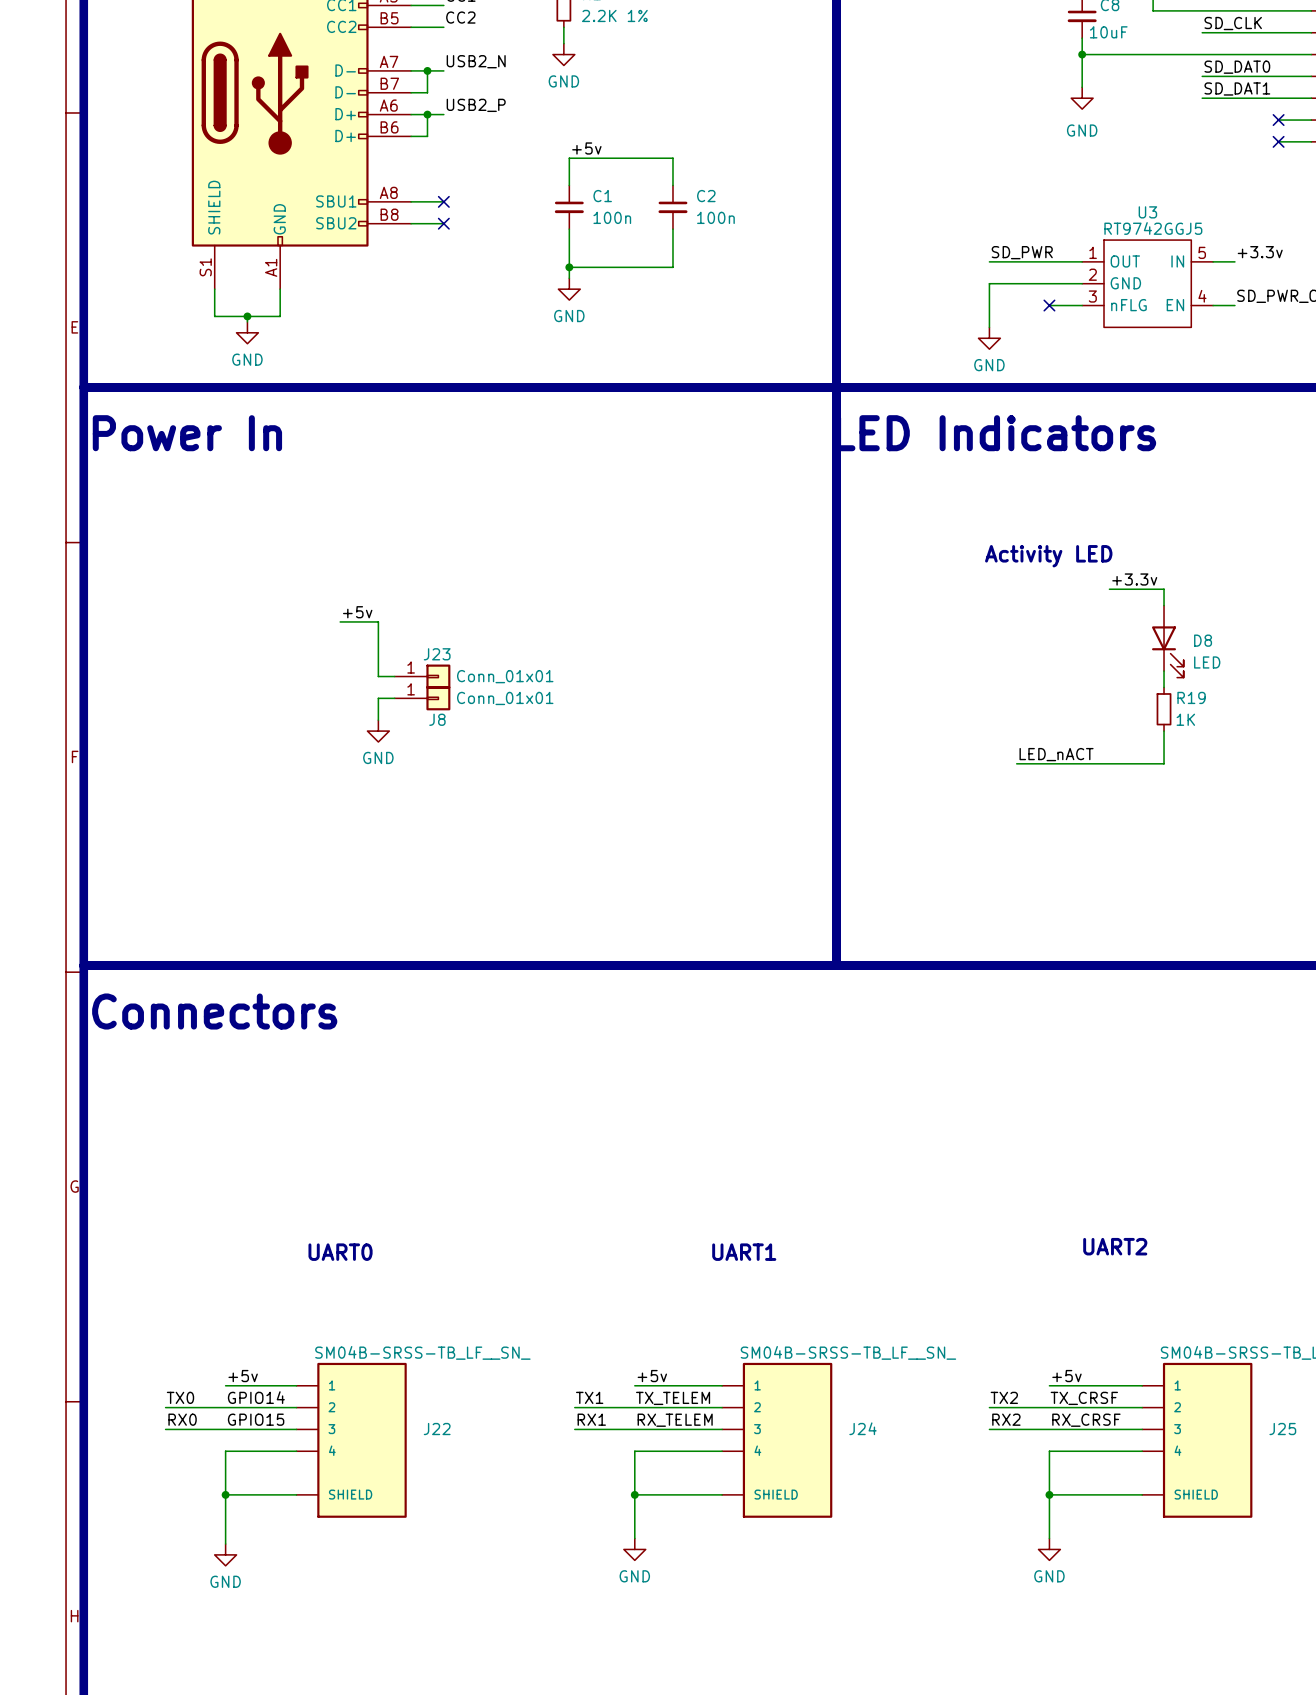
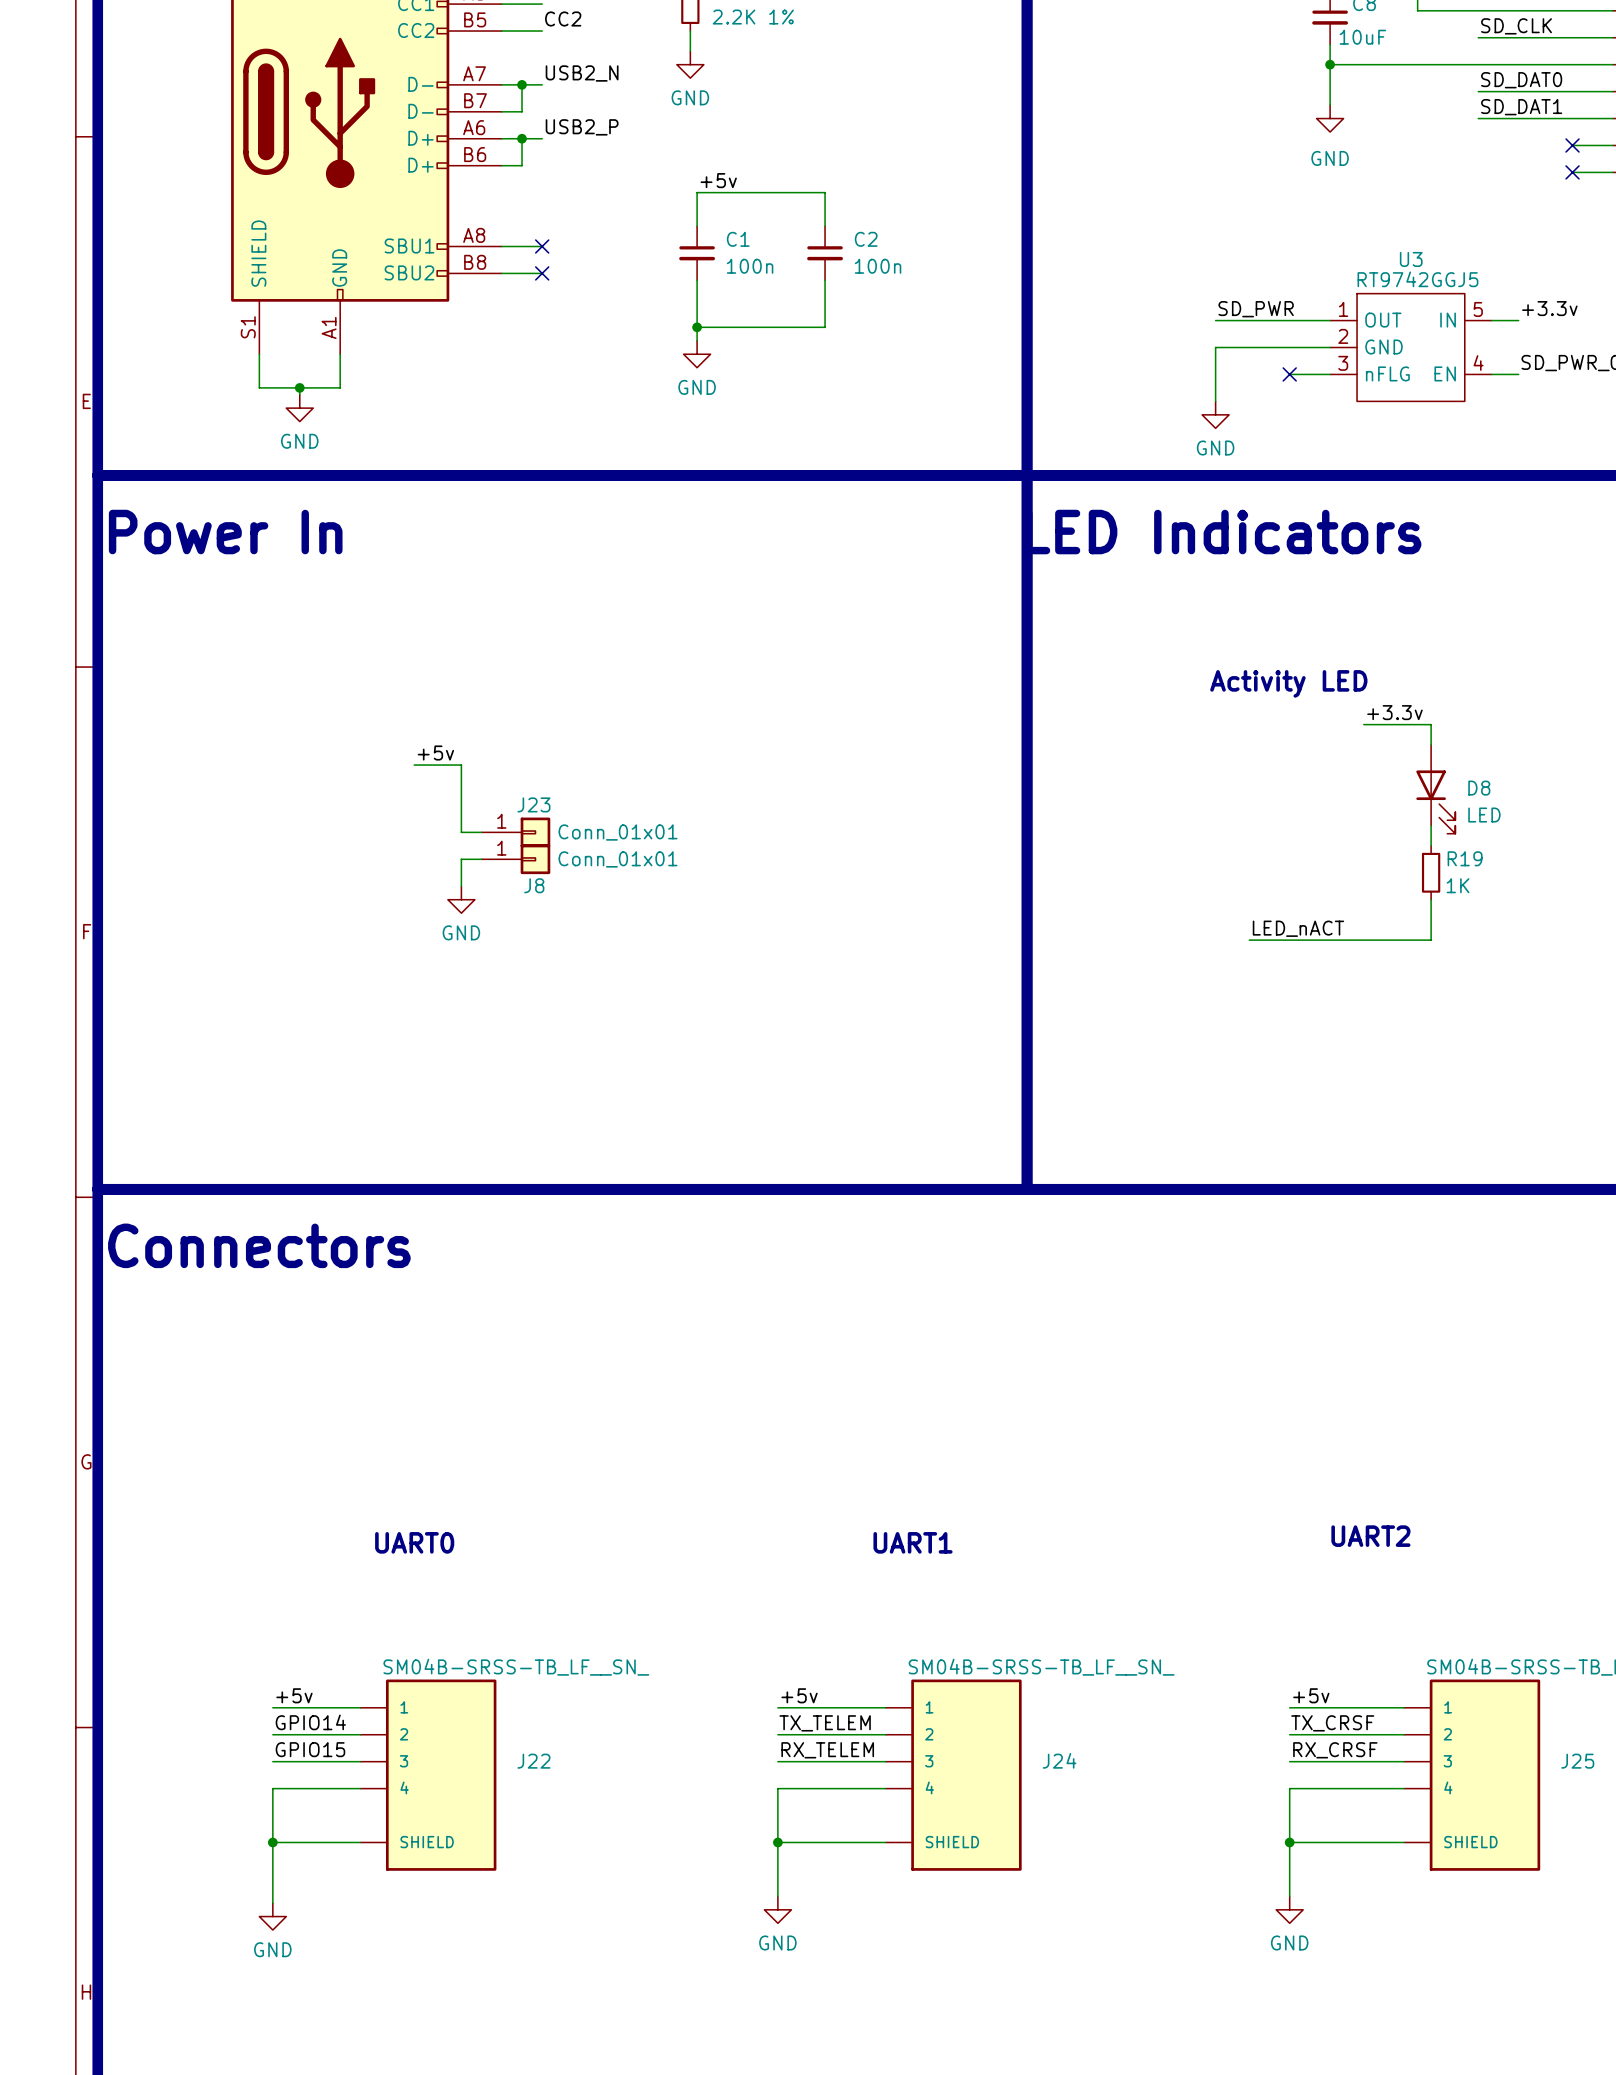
label: TX0 (180, 1397) -> none
label: TX1 (589, 1397) -> none
label: TX2 (1004, 1397) -> none
wire: (165, 1407) (225, 1407) -> none
wire: (574, 1407) (634, 1407) -> none
wire: (989, 1407) (1049, 1407) -> none
label: RX0 (182, 1419) -> none
label: RX1 (591, 1419) -> none
label: RX2 (1006, 1419) -> none
wire: (165, 1429) (225, 1429) -> none
wire: (574, 1429) (634, 1429) -> none
wire: (989, 1429) (1049, 1429) -> none

